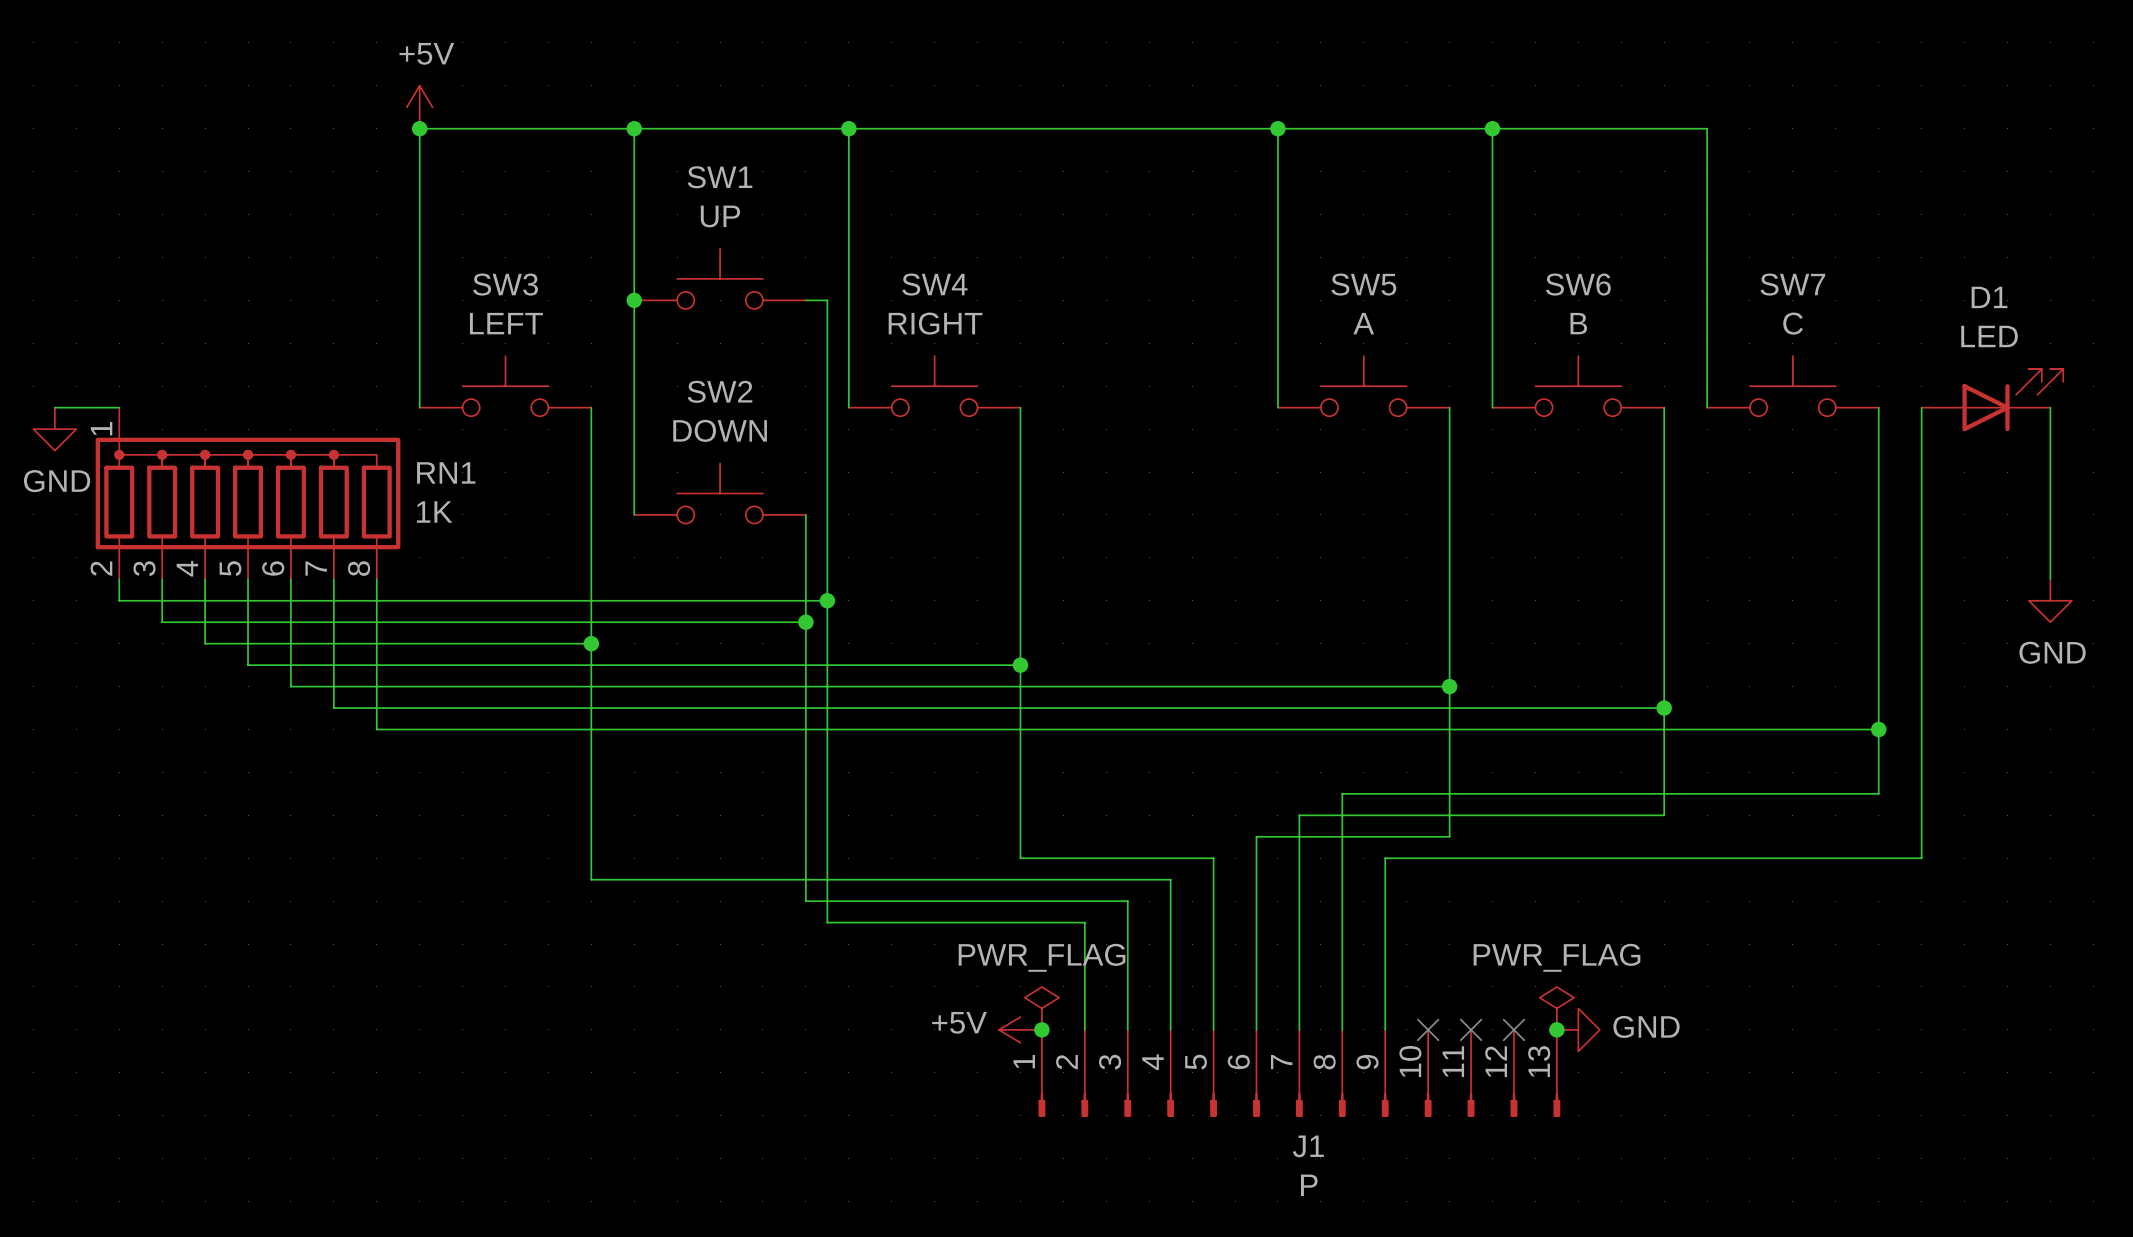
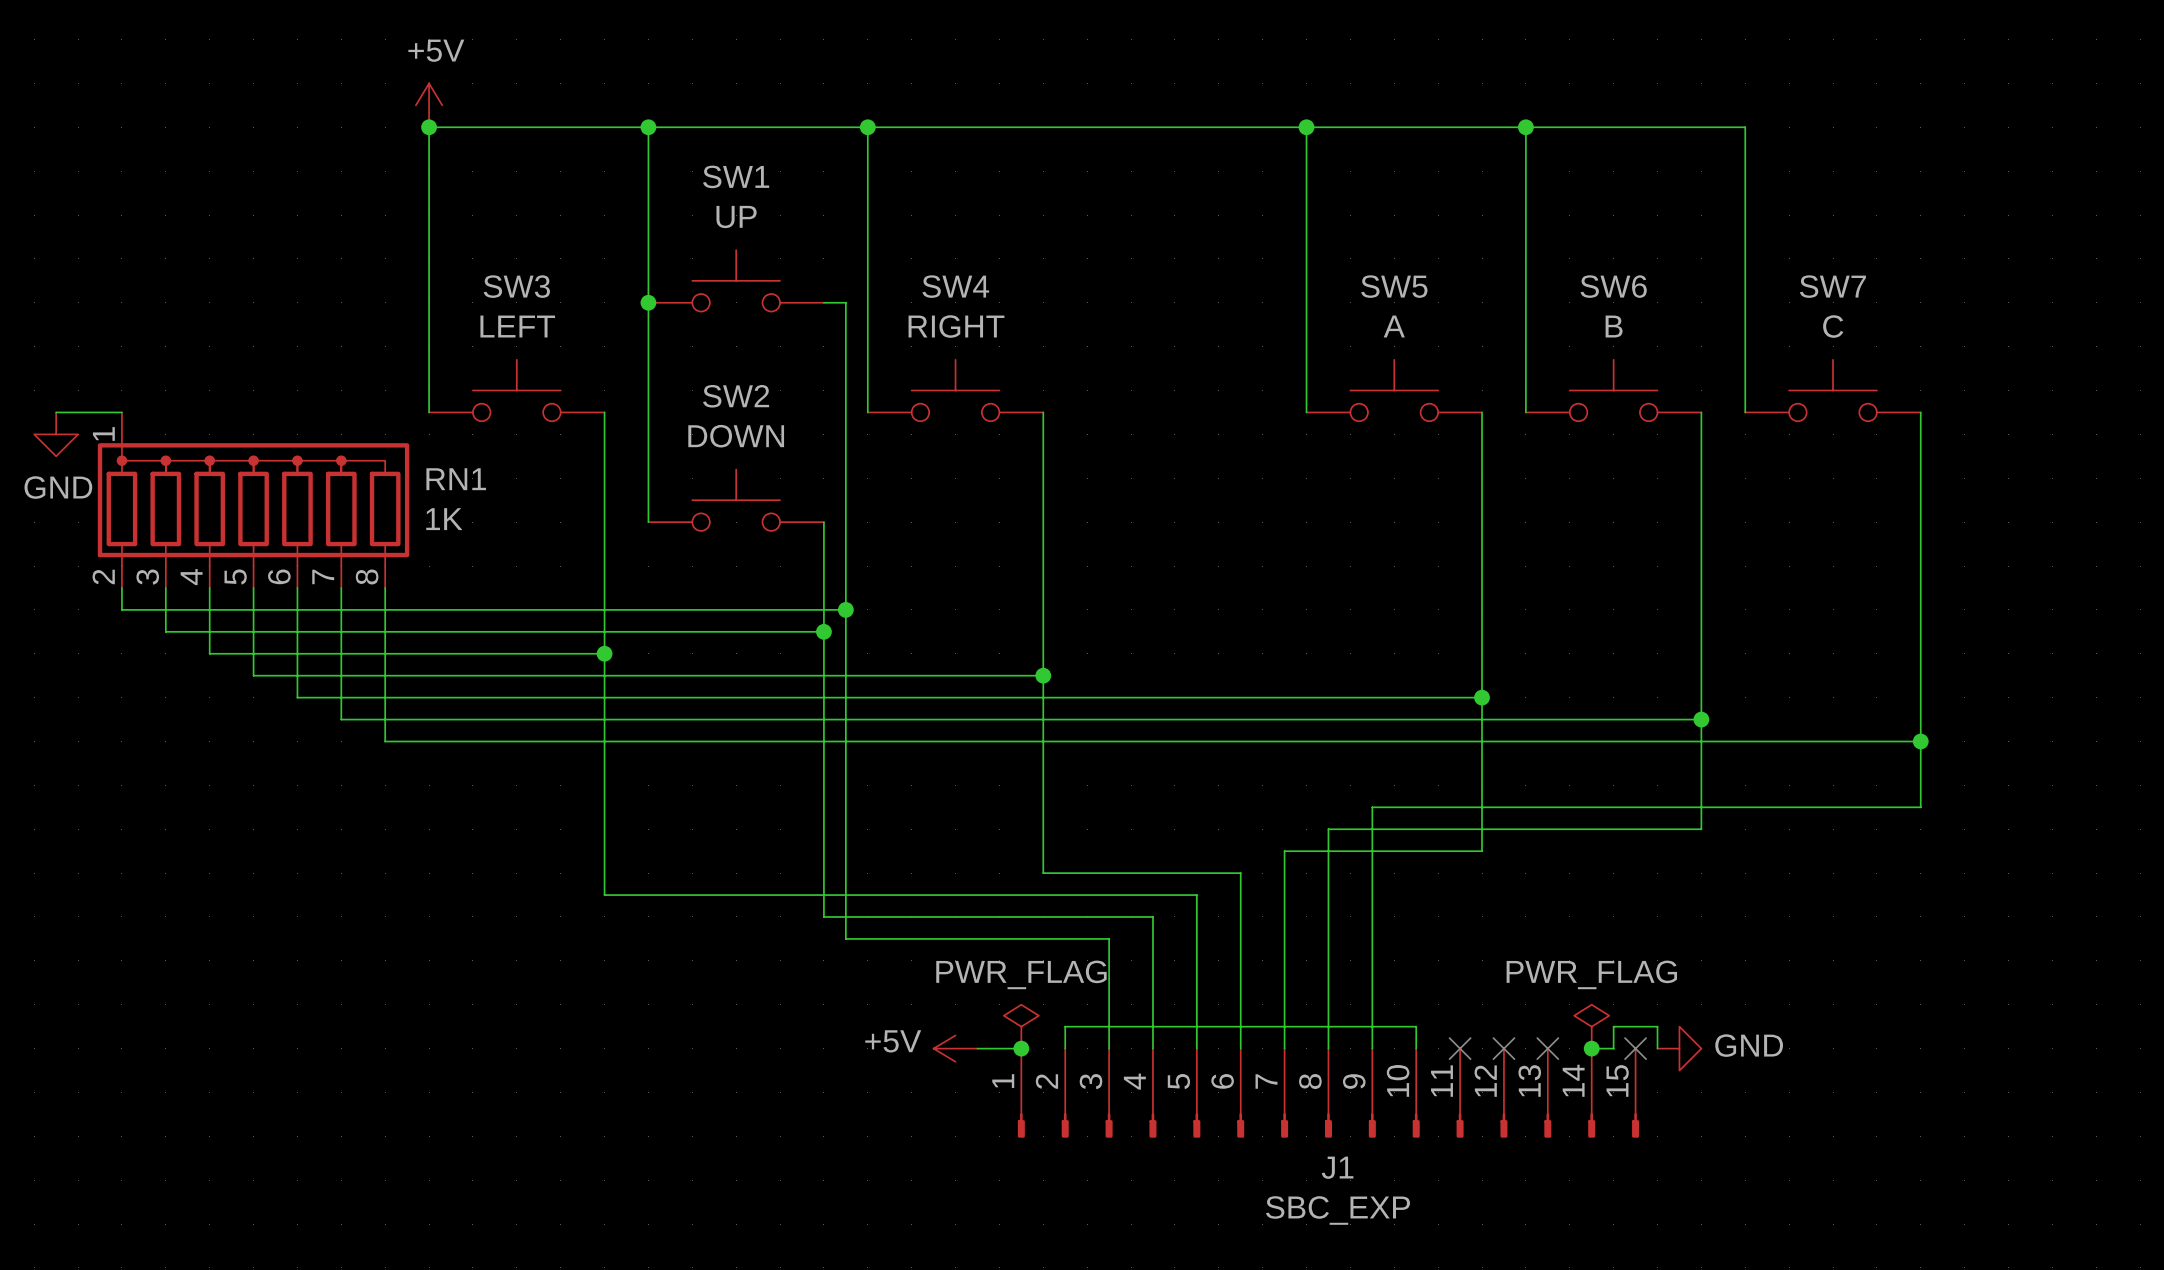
D1: LED (1992, 400) -> none
wire: (1921, 407) (1921, 858) (1385, 858) (1385, 1008) -> (1065, 1048) (1065, 1026) (1416, 1026)
wire: (2050, 407) (2050, 579) -> none
power symbol: GND (2050, 600) -> none
power symbol position: PWR_FLAG (1041, 1008) -> PWR_FLAG (1021, 1026)
wire: none -> (977, 1048) (1021, 1048)
power symbol position: +5V (1020, 1029) -> +5V (955, 1048)
J1 symbol: [1038, 1029, 1561, 1118] -> [1017, 1048, 1640, 1138]
junction position: (1041, 1029) -> (1021, 1048)
wire: none -> (1591, 1048) (1613, 1048) (1613, 1026) (1657, 1026) (1657, 1048)
power symbol position: GND (1578, 1029) -> GND (1679, 1048)
no-connect mark: none -> (1635, 1048)
J1 value: P (1309, 1185) -> SBC_EXP (1338, 1210)

